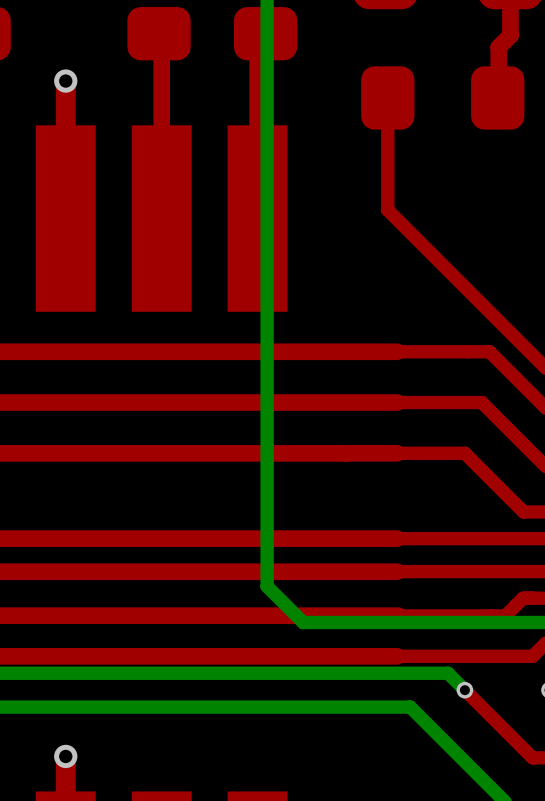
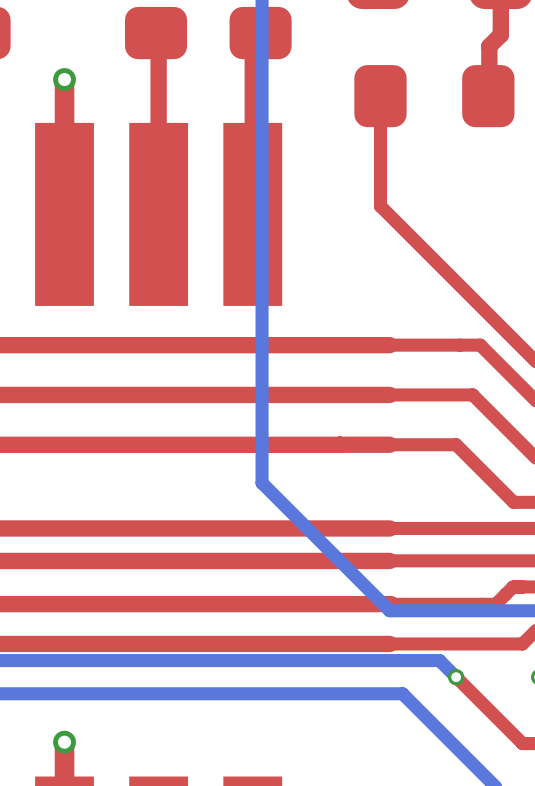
bottom track: (267, 492) (267, 586) (303, 622) (397, 622) -> (262, 483) (389, 610)

